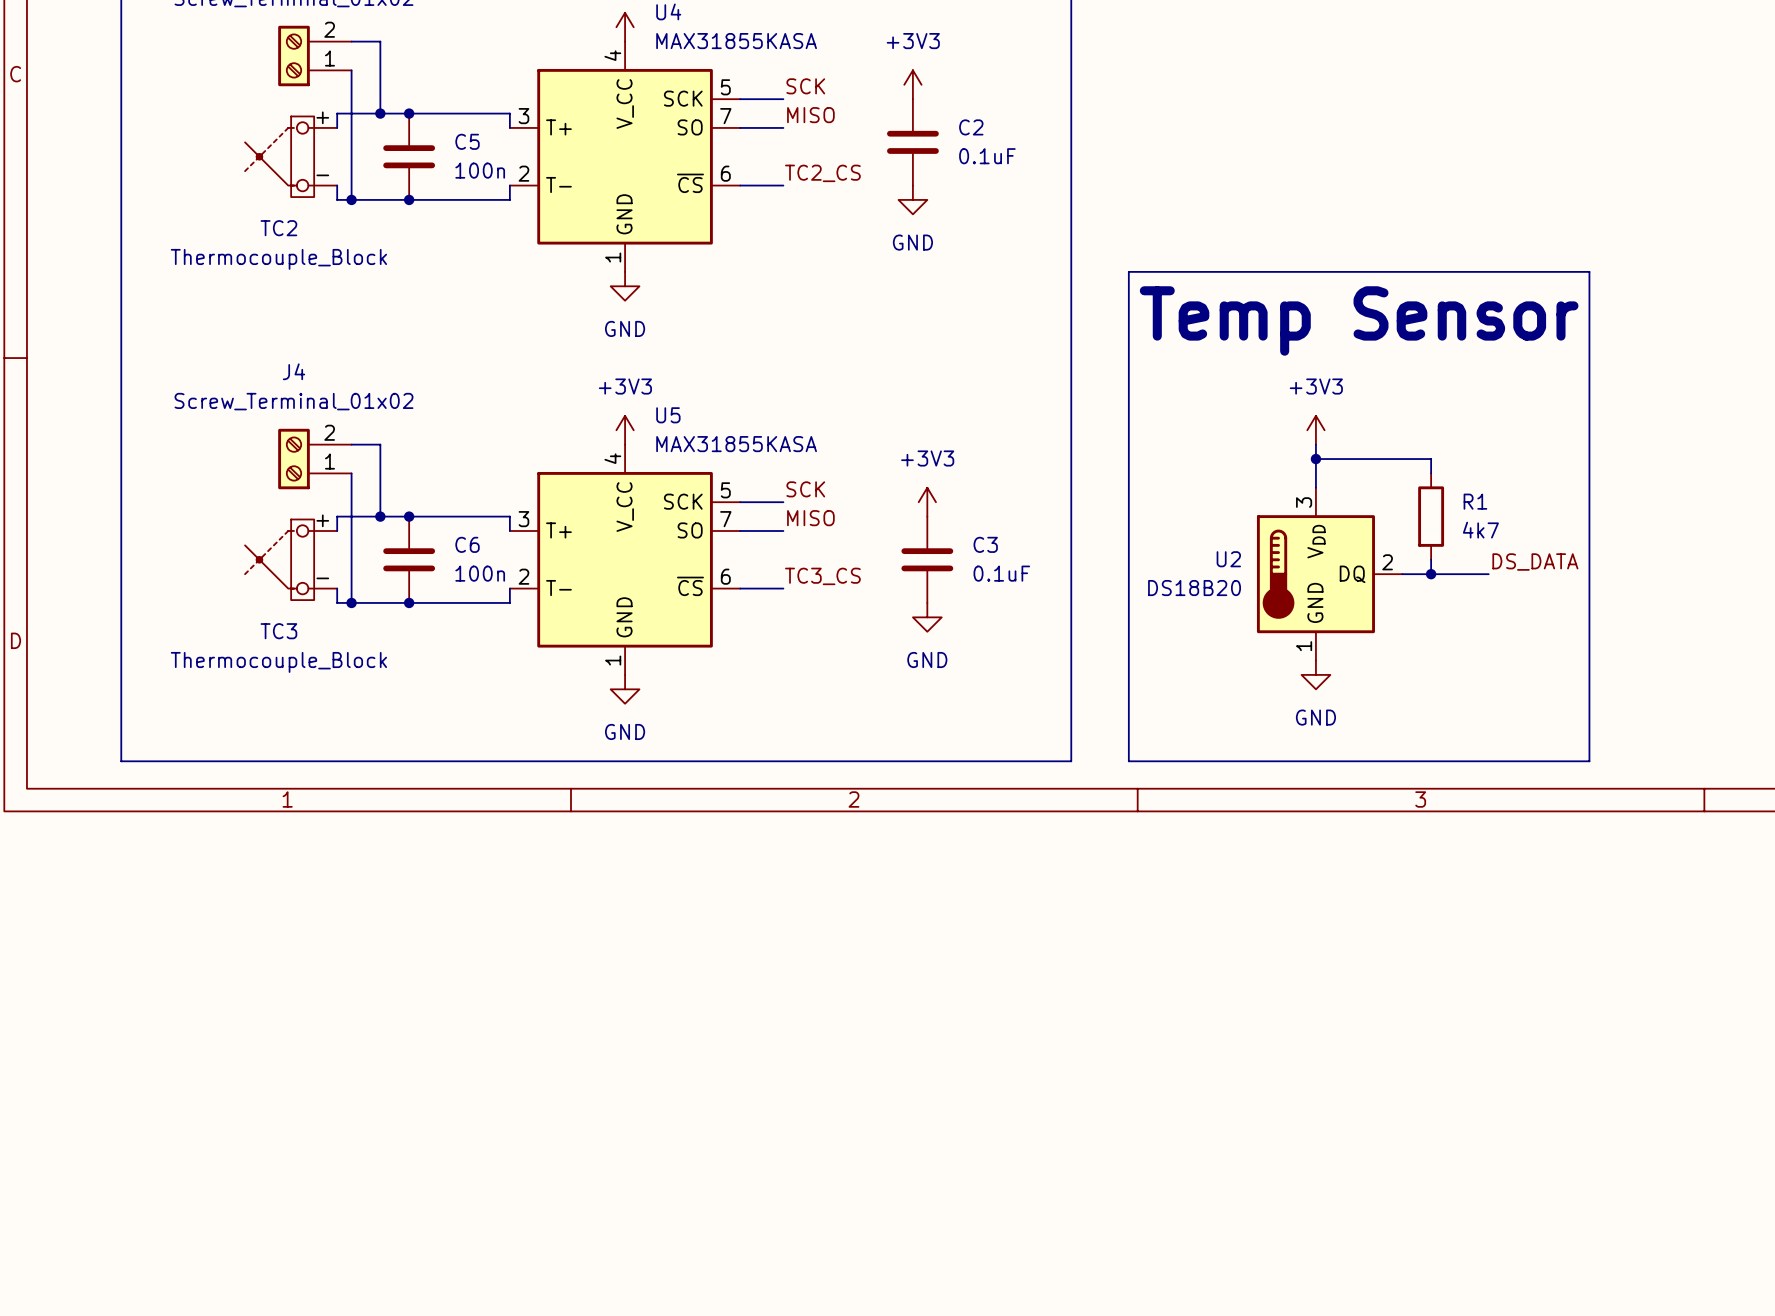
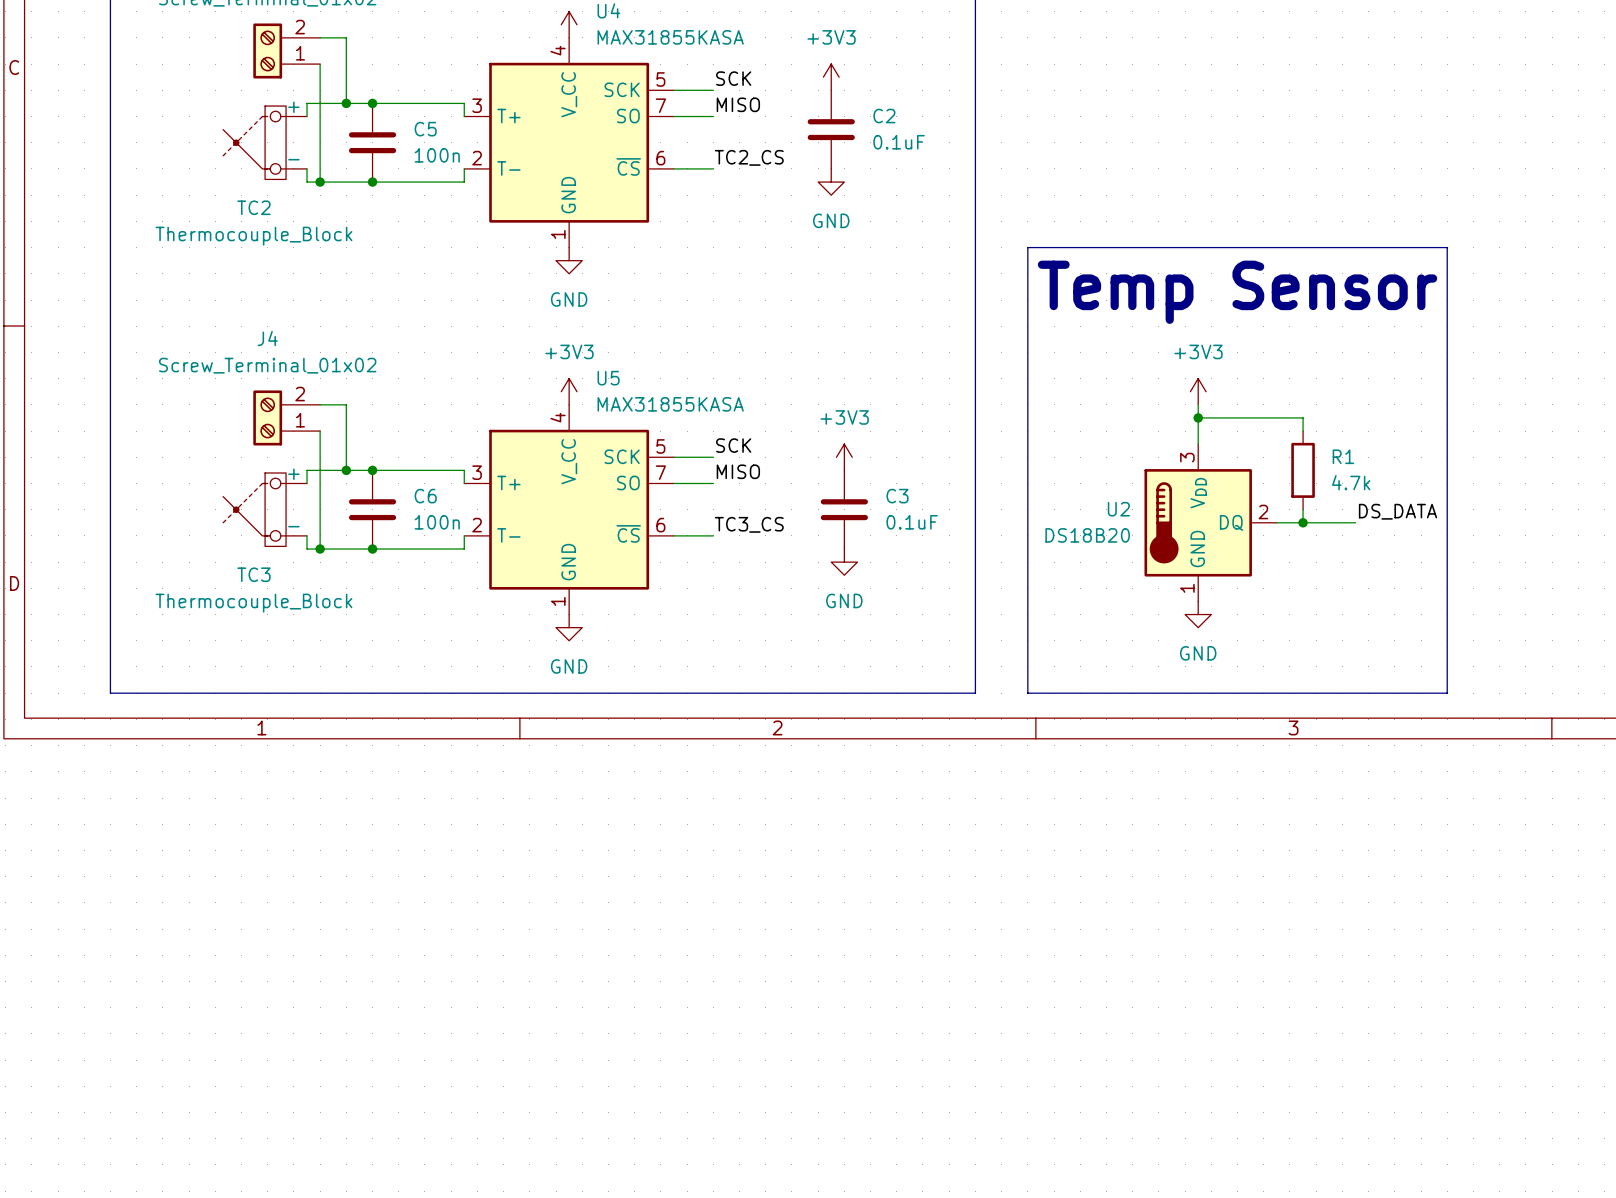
R1 value: 4k7 (1480, 530) -> 4.7k (1351, 482)

